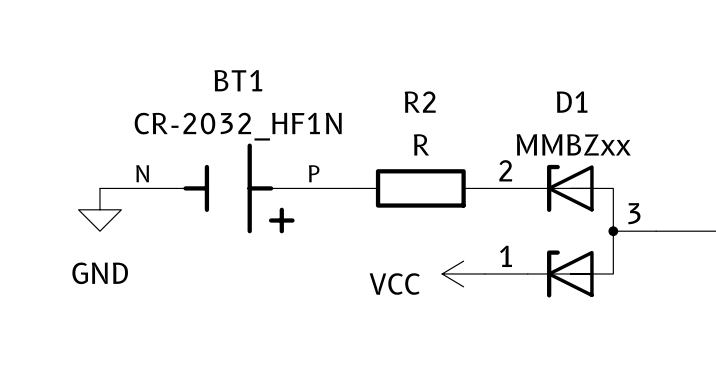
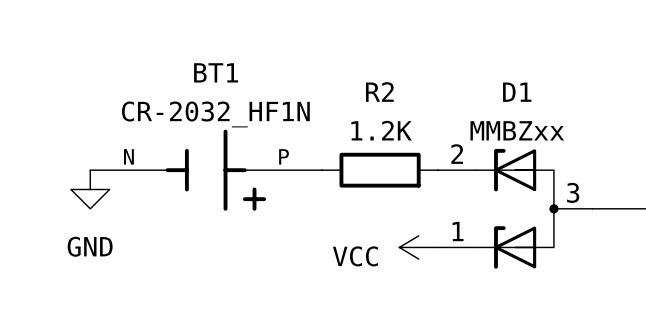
R2 value: R (421, 144) -> 1.2K (381, 130)

